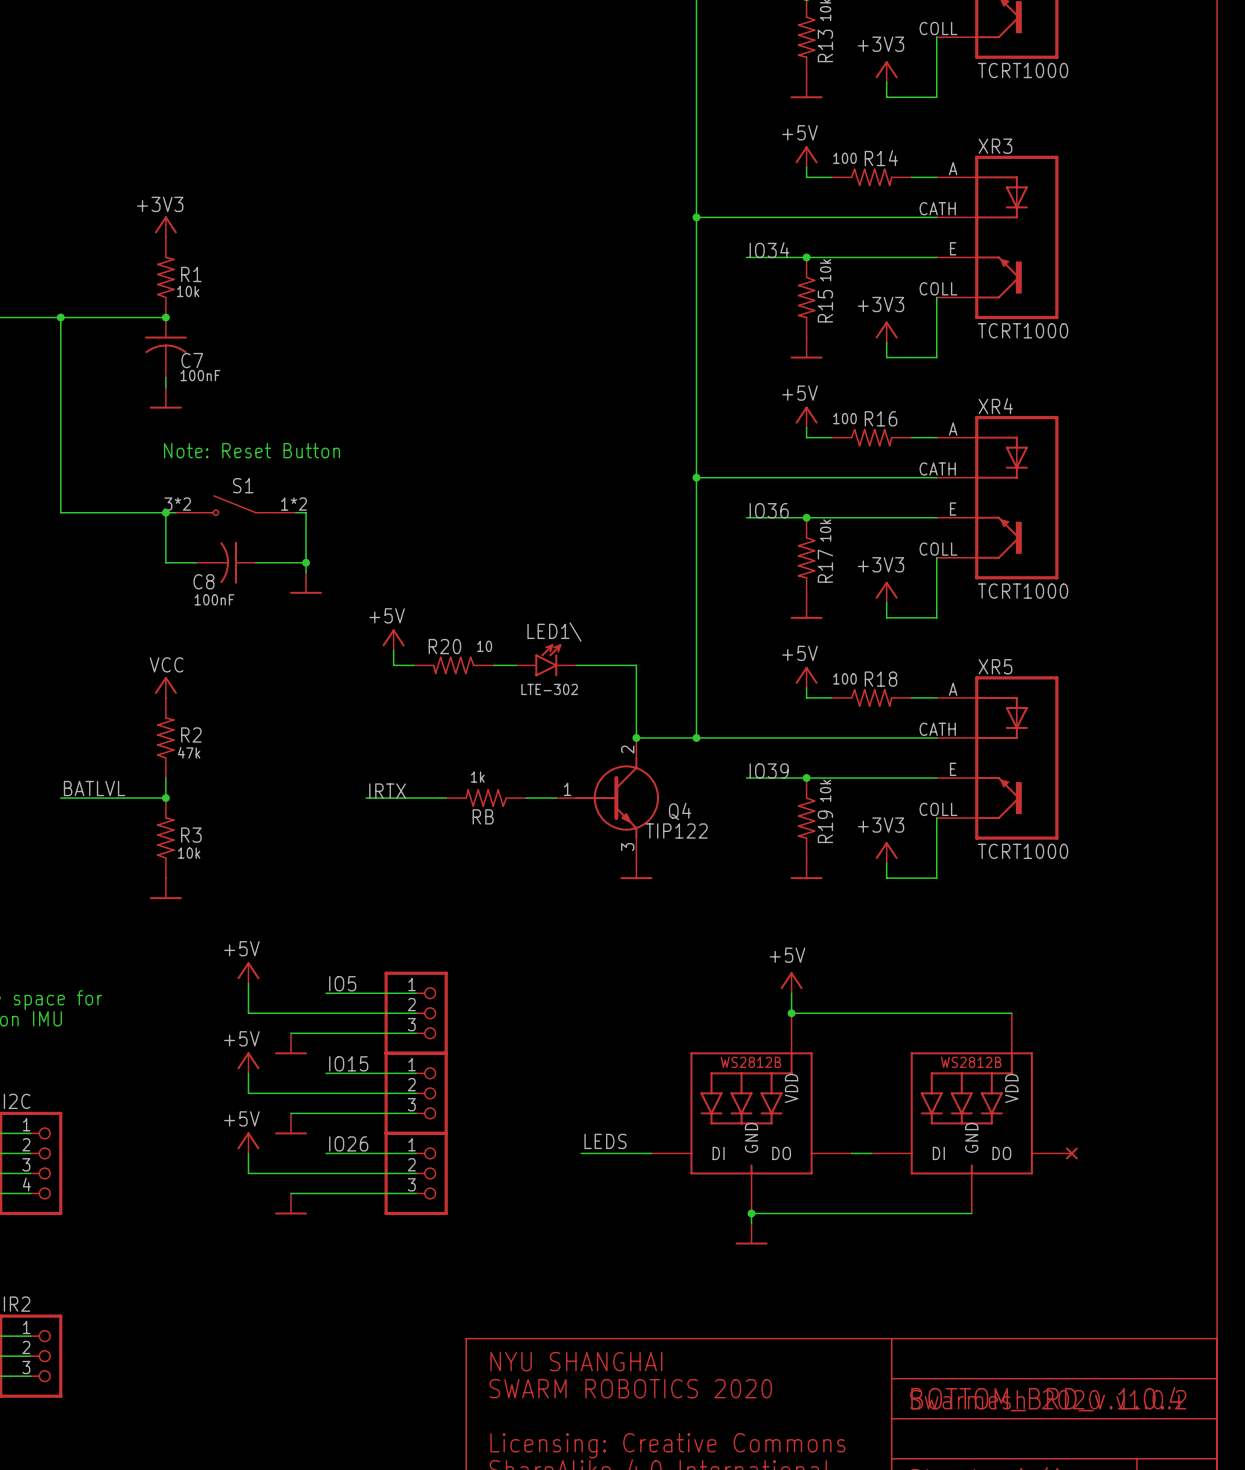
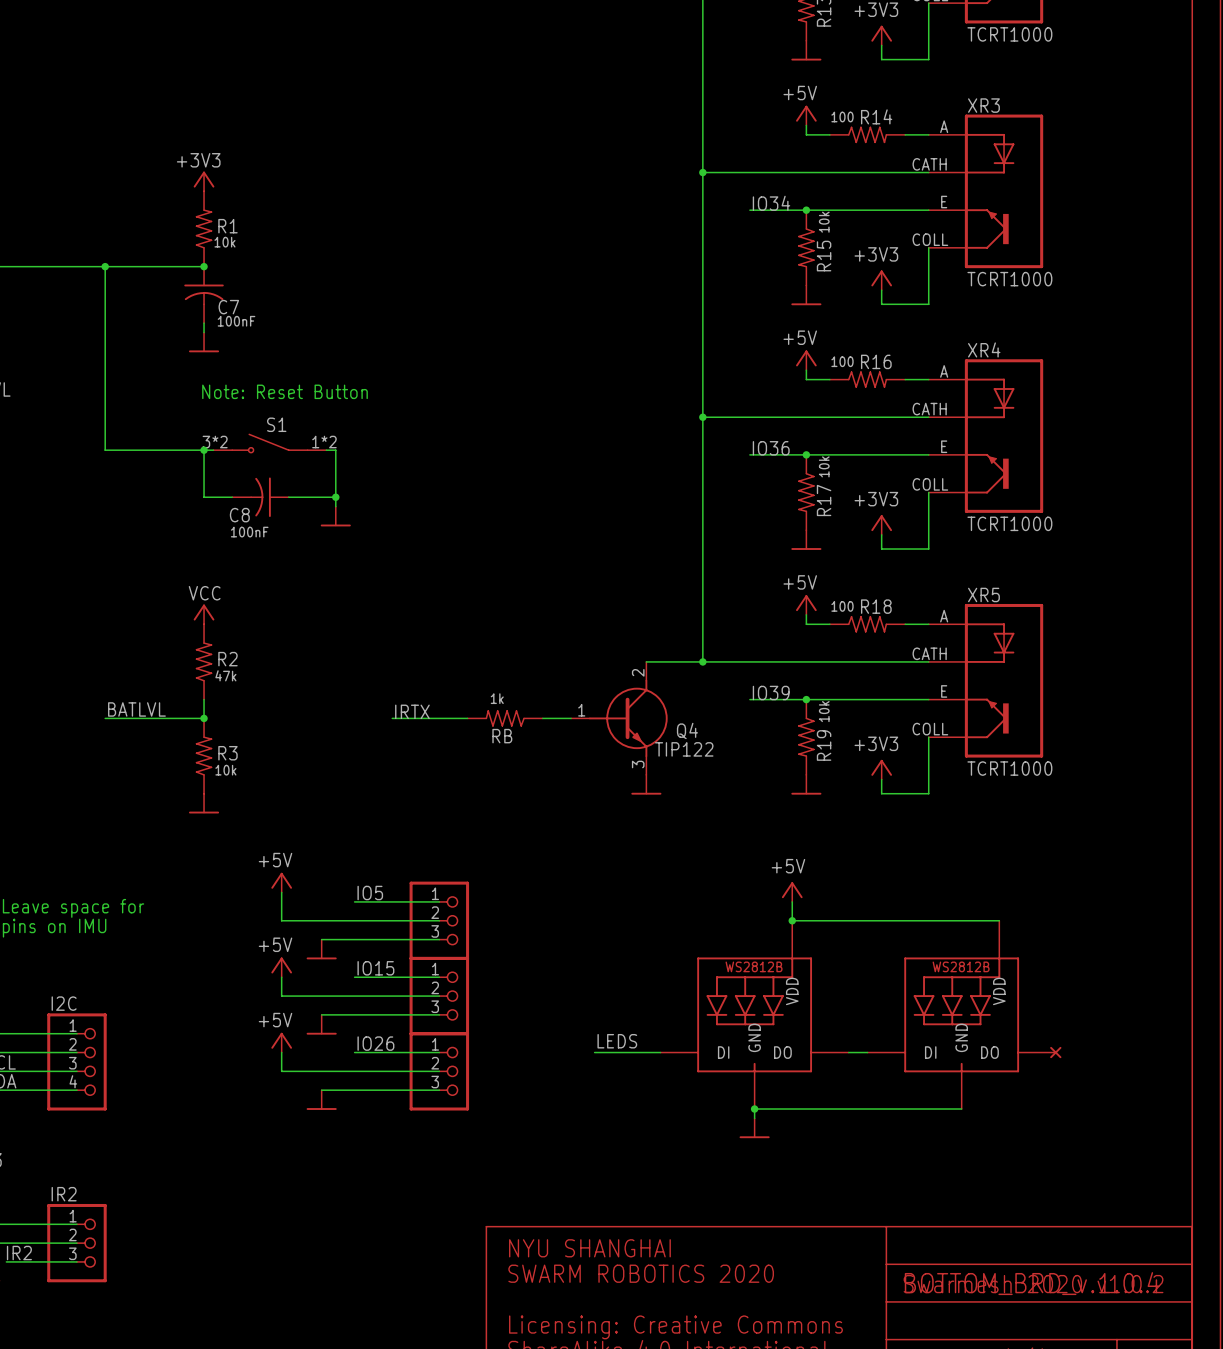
power symbol: +5V (393, 639) -> none
wire: (393, 650) (393, 665) (413, 665) -> none
LED1\: LTE-302 (546, 660) -> none
R20: 10 (453, 665) -> none
wire: (493, 665) (516, 665) -> none
wire: (576, 665) (636, 665) (636, 737) -> none
junction: (636, 737) -> none

